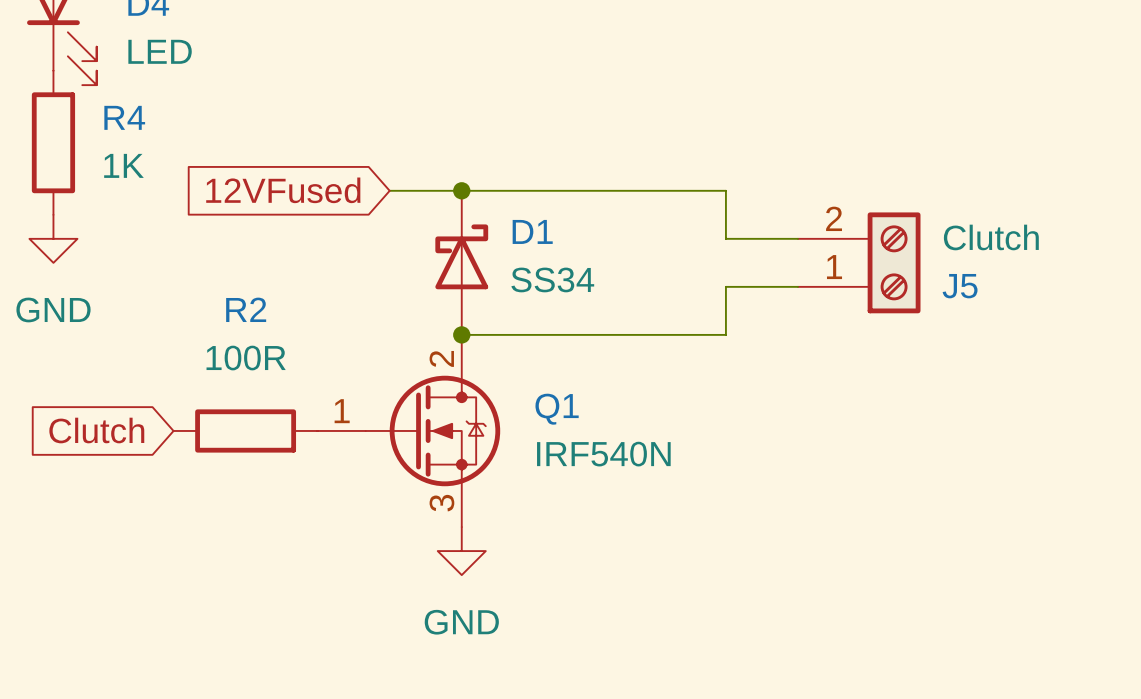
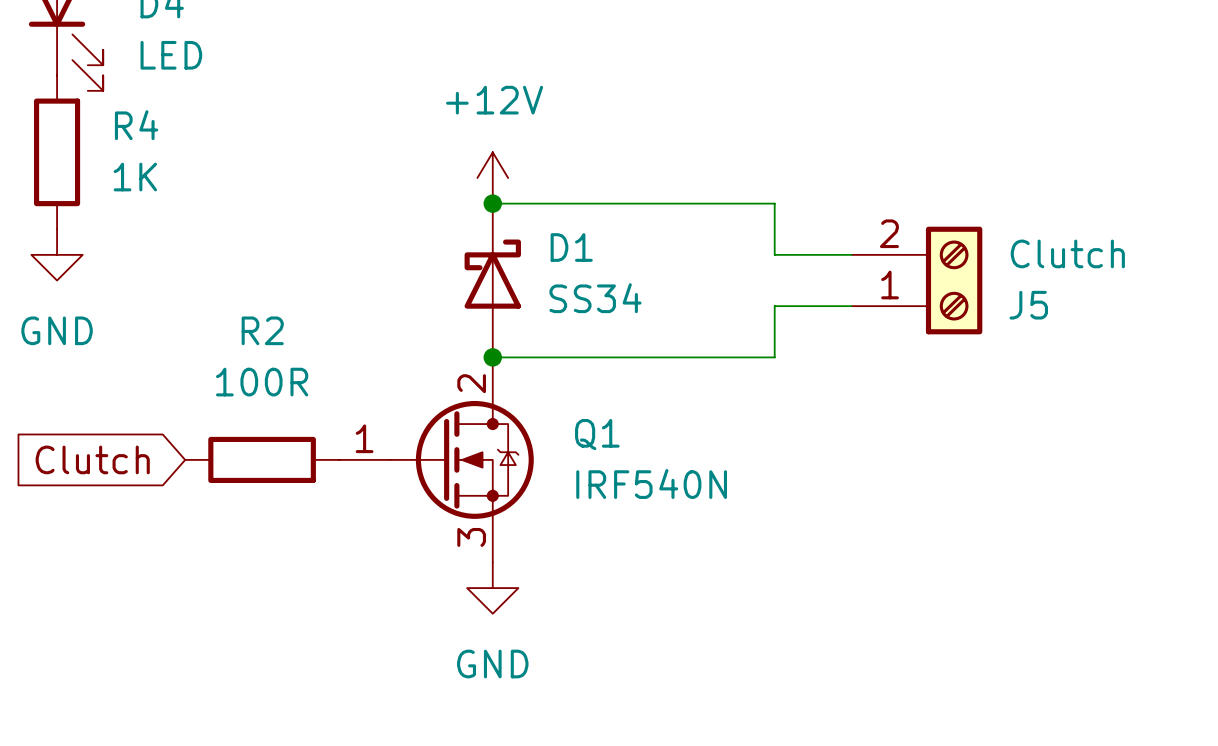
power symbol: none -> +12V (492, 177)
global label: 12VFused (283, 190) -> none
wire: (389, 190) (461, 190) -> none

